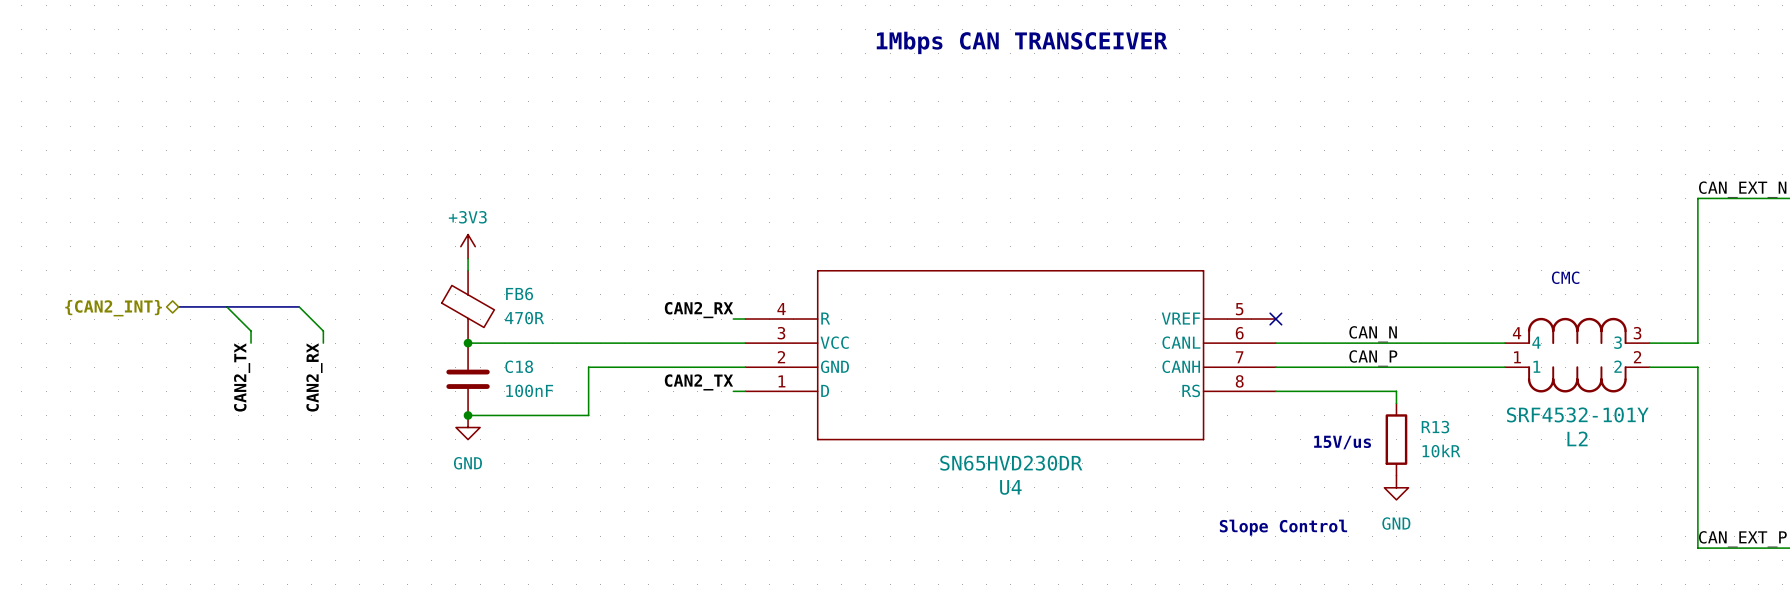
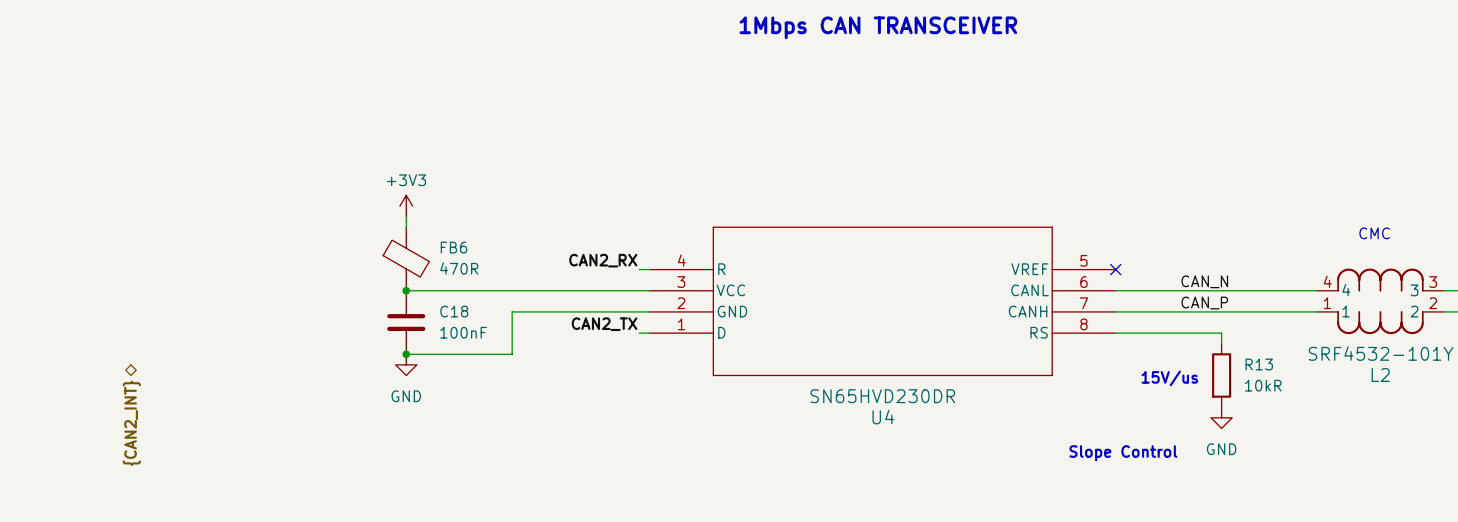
bus: (178, 306) (299, 306) -> none
wire: (226, 306) (251, 331) (251, 343) -> none
wire: (299, 306) (323, 331) (323, 343) -> none
hierarchical label rotation: 0° (113, 308) -> 90° counterclockwise (131, 423)
hierarchical label position: {CAN2_INT} (113, 308) -> {CAN2_INT} (131, 423)
label: CAN2_TX (242, 377) -> none
label: CAN2_RX (314, 377) -> none

